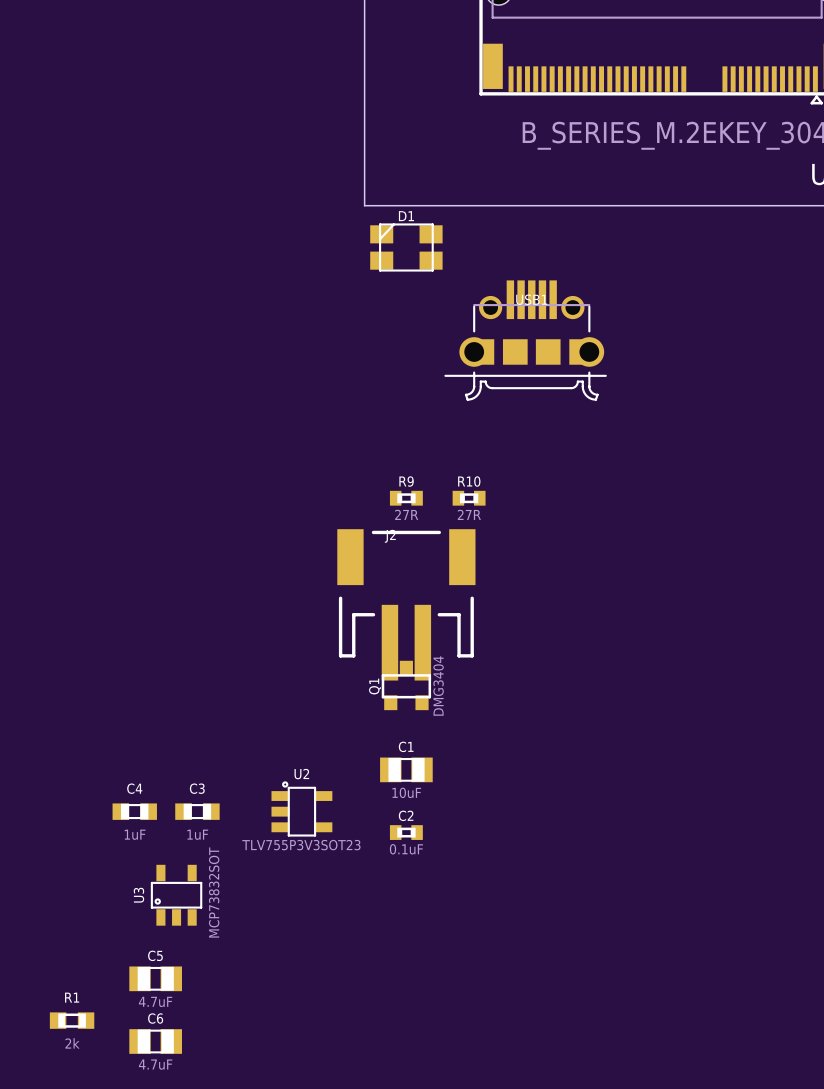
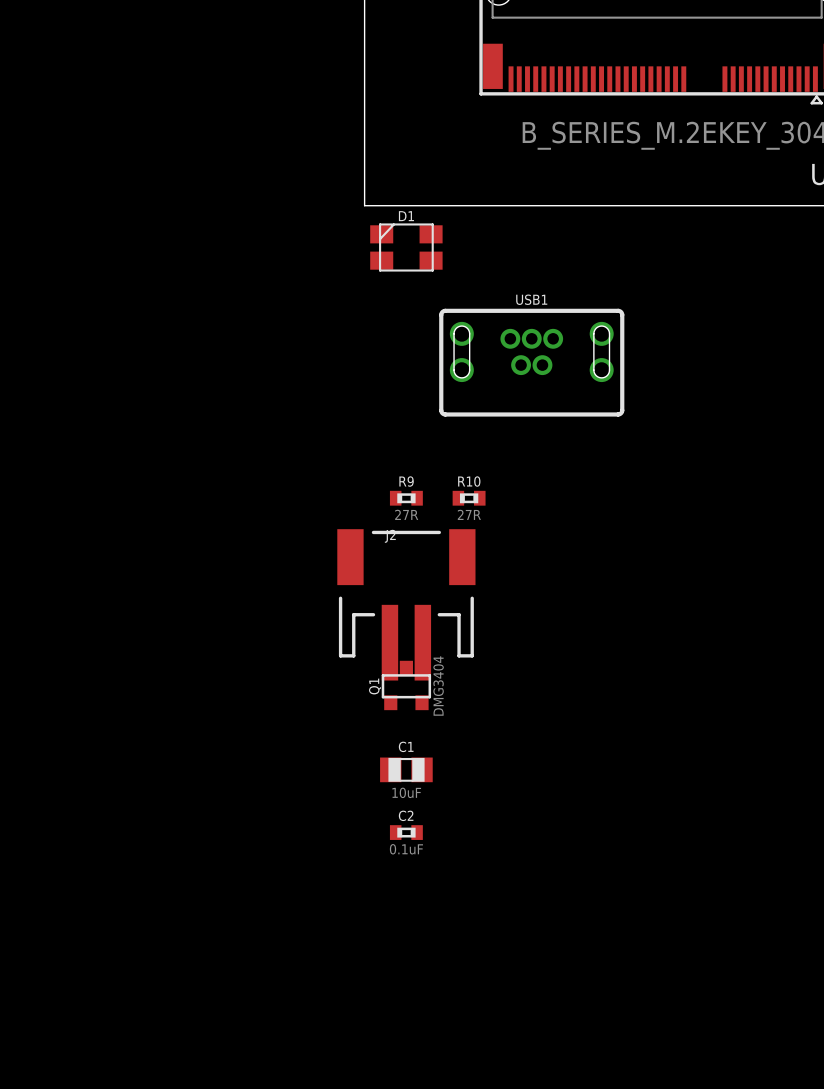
USB1 footprint: [444, 280, 607, 401] -> [439, 308, 625, 417]
U2: TLV755P3V3SOT23 (301, 808) -> none
C4: 1uF (134, 811) -> none
C3: 1uF (197, 811) -> none
U3: MCP73832SOT (176, 895) -> none
C5: 4.7uF (155, 978) -> none
R1: 2k (72, 1020) -> none
C6: 4.7uF (155, 1041) -> none

